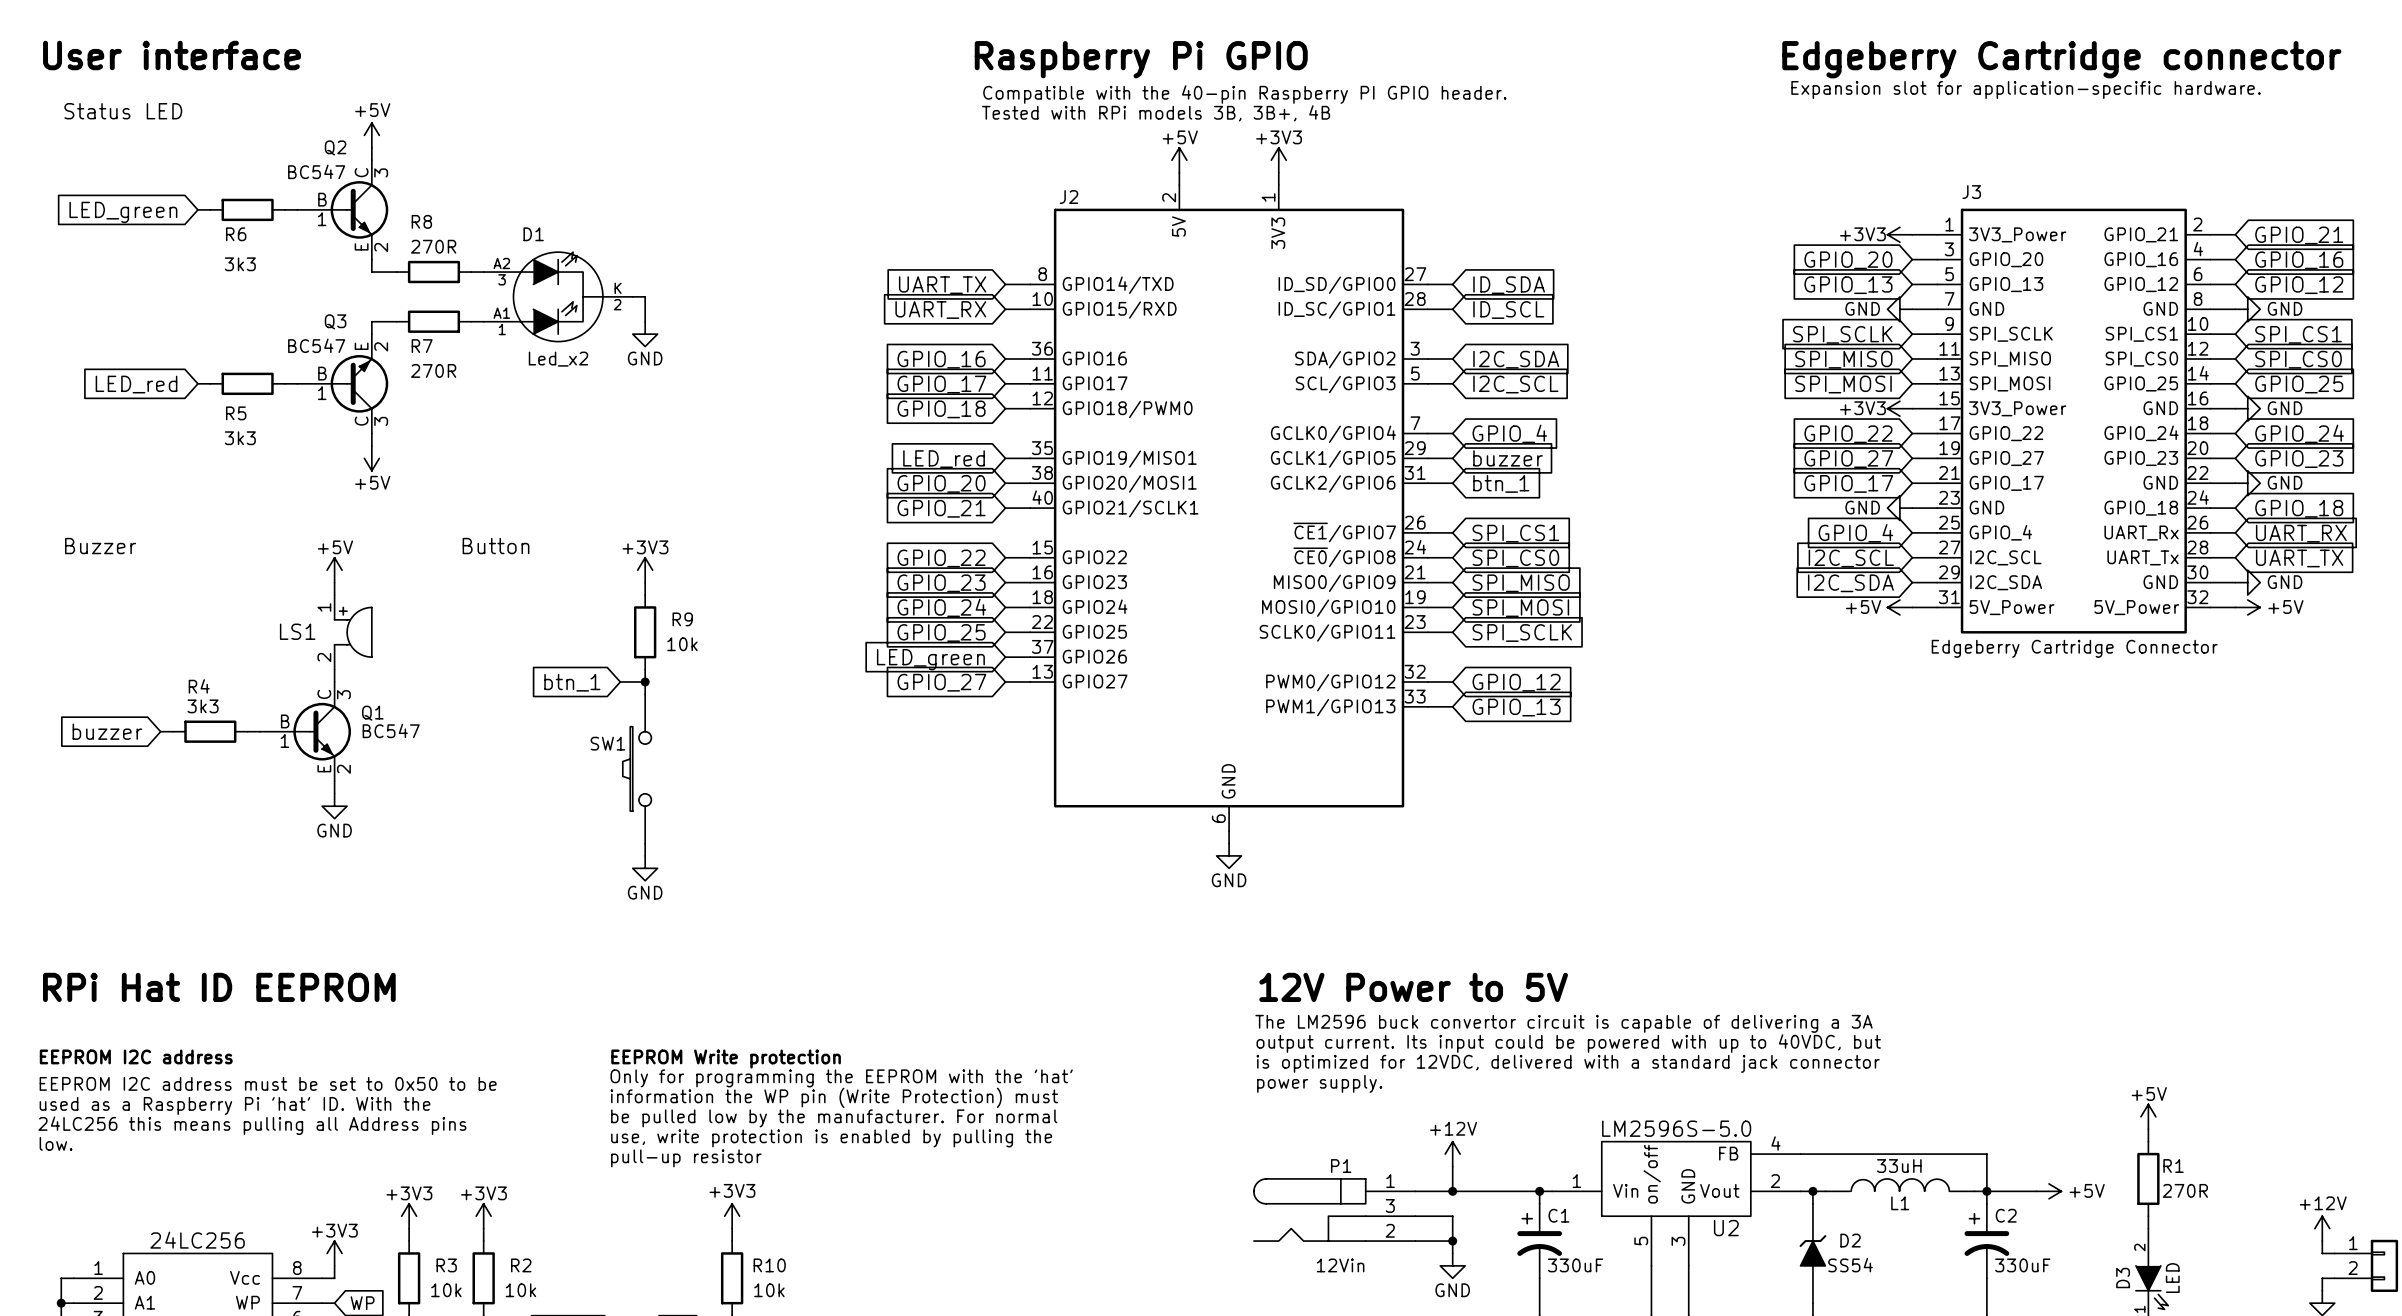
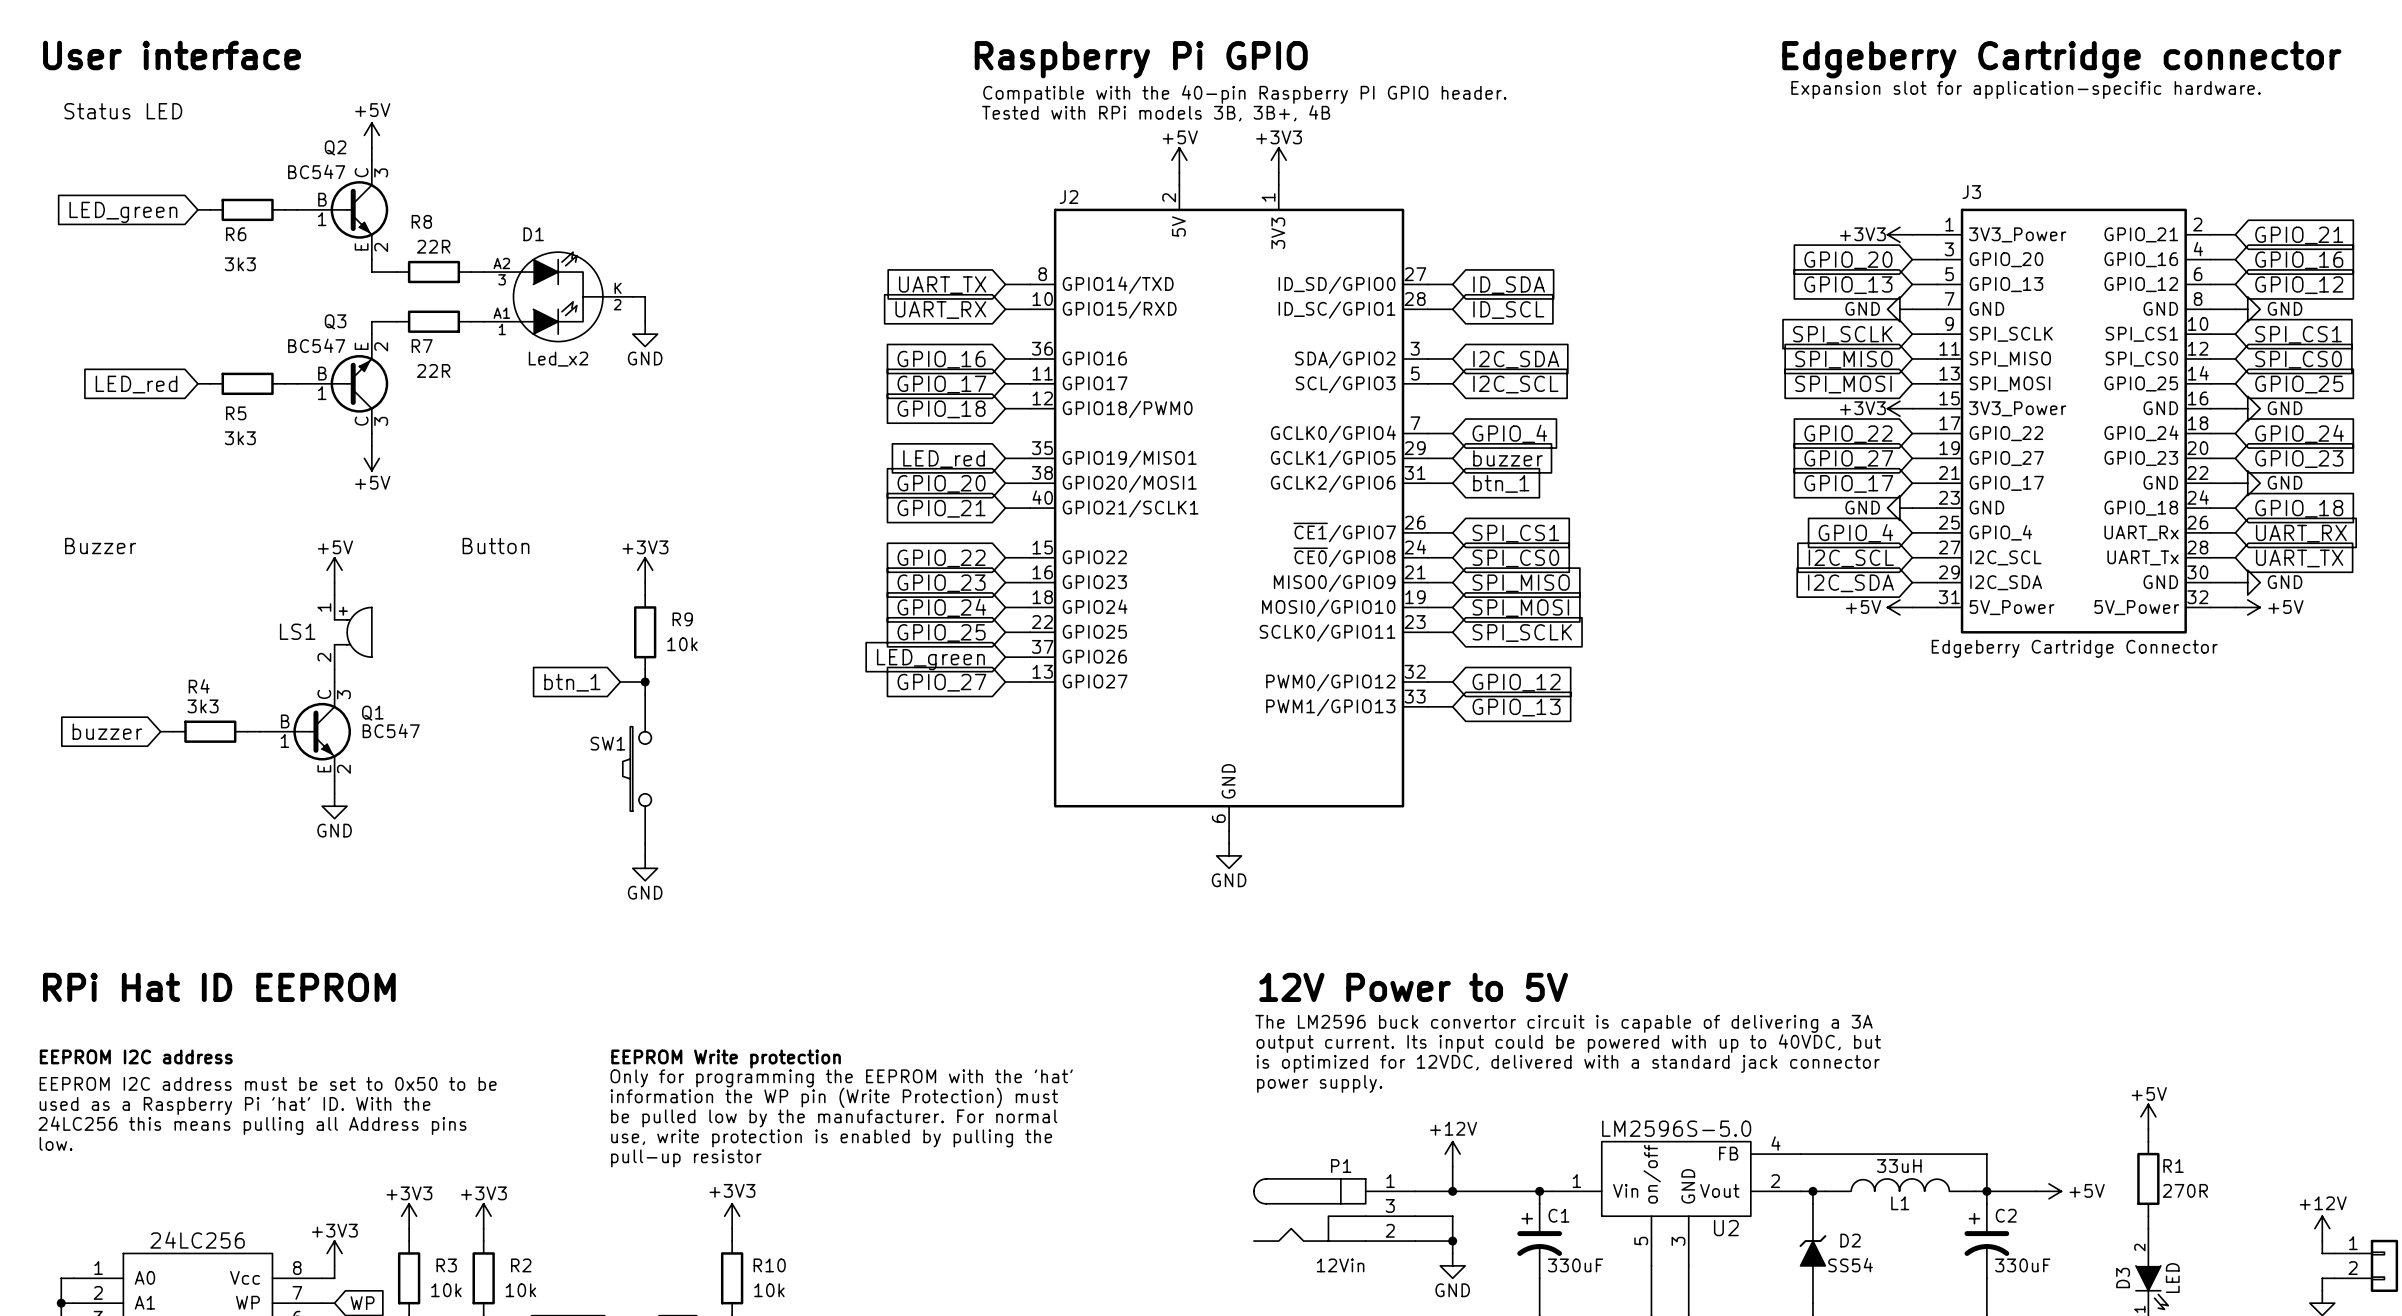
R8 value: 270R (433, 246) -> 22R (433, 246)
R7 value: 270R (433, 370) -> 22R (433, 370)

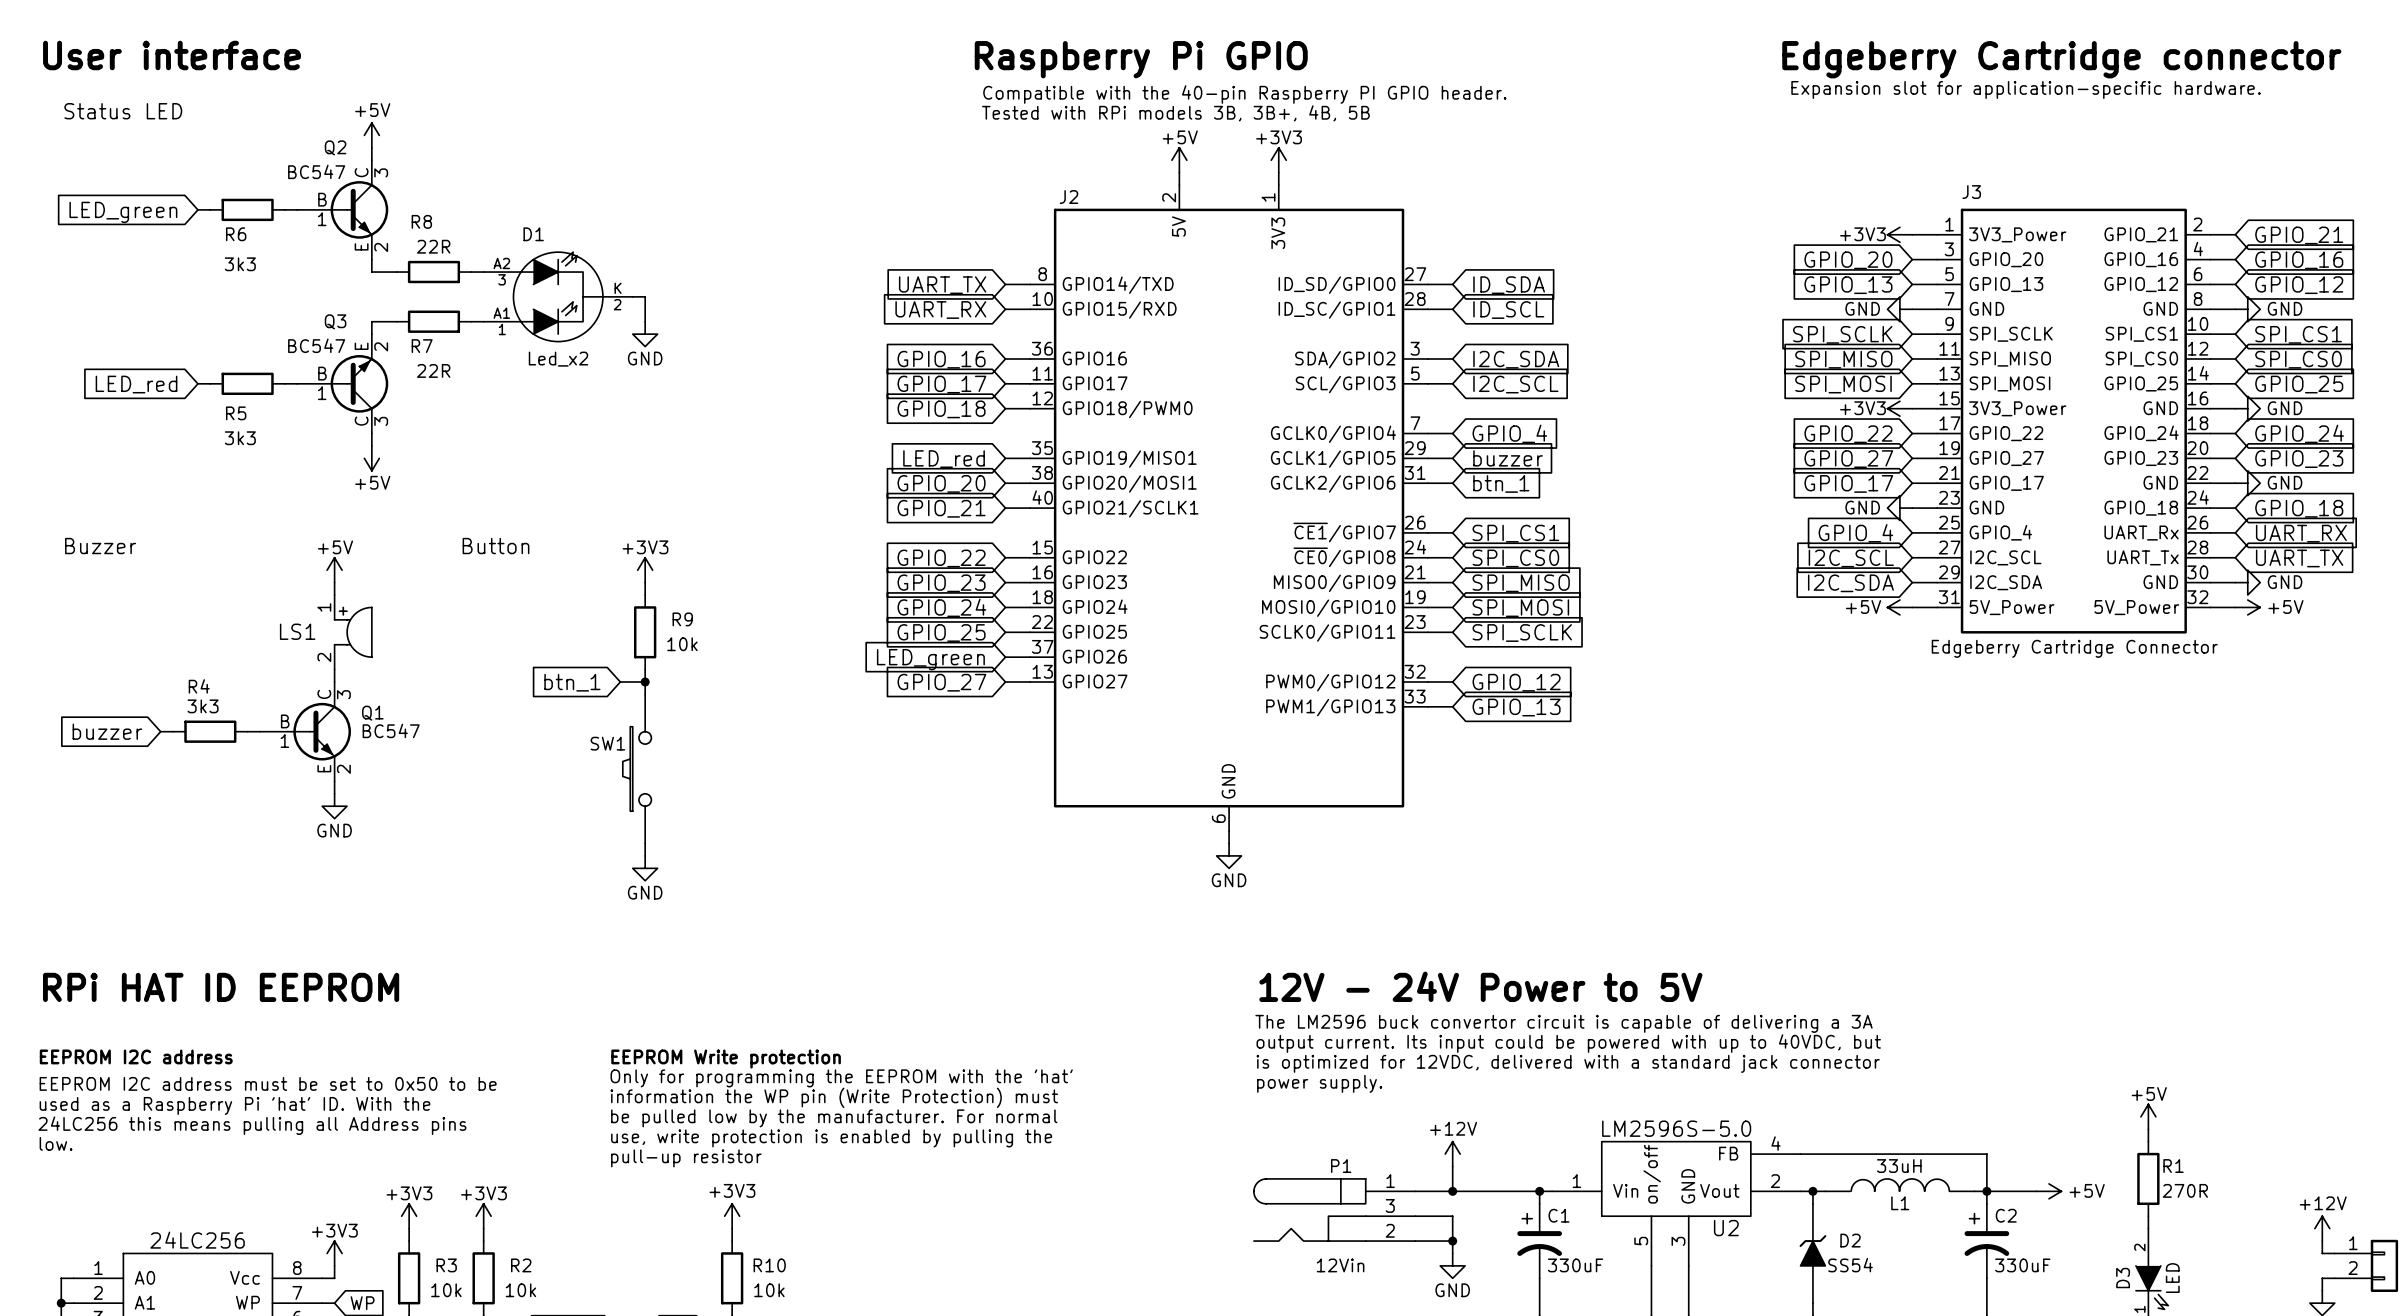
text: Tested with RPi models 3B, 3B+, 4B (1156, 113) -> Tested with RPi models 3B, 3B+, 4B, 5B (1175, 113)
text: RPi Hat ID EEPROM (219, 987) -> RPi HAT ID EEPROM (221, 987)
text: 12V Power to 5V (1413, 987) -> 12V - 24V Power to 5V (1480, 986)

